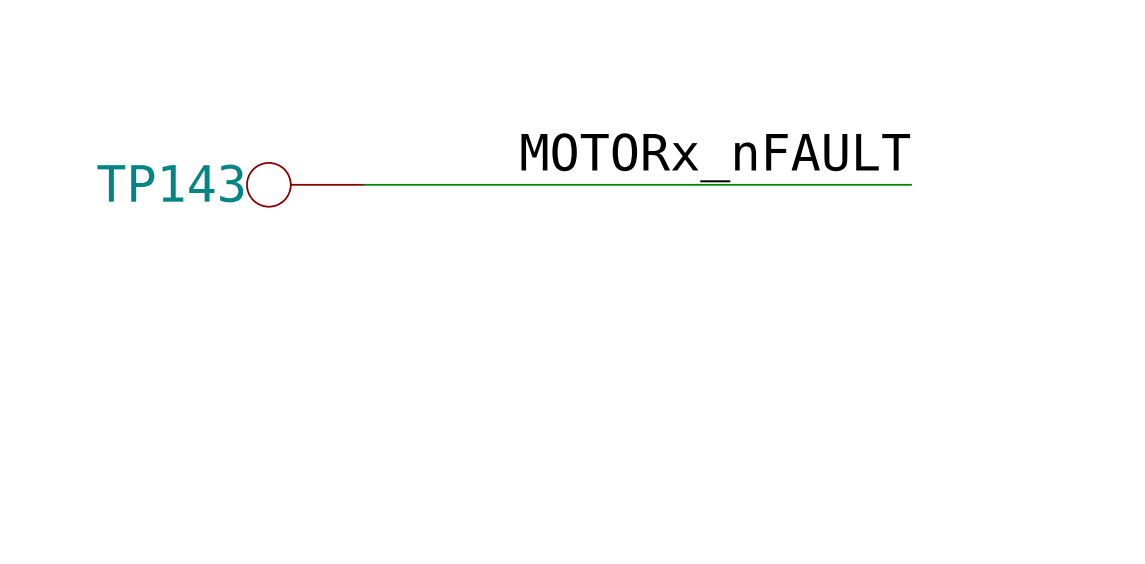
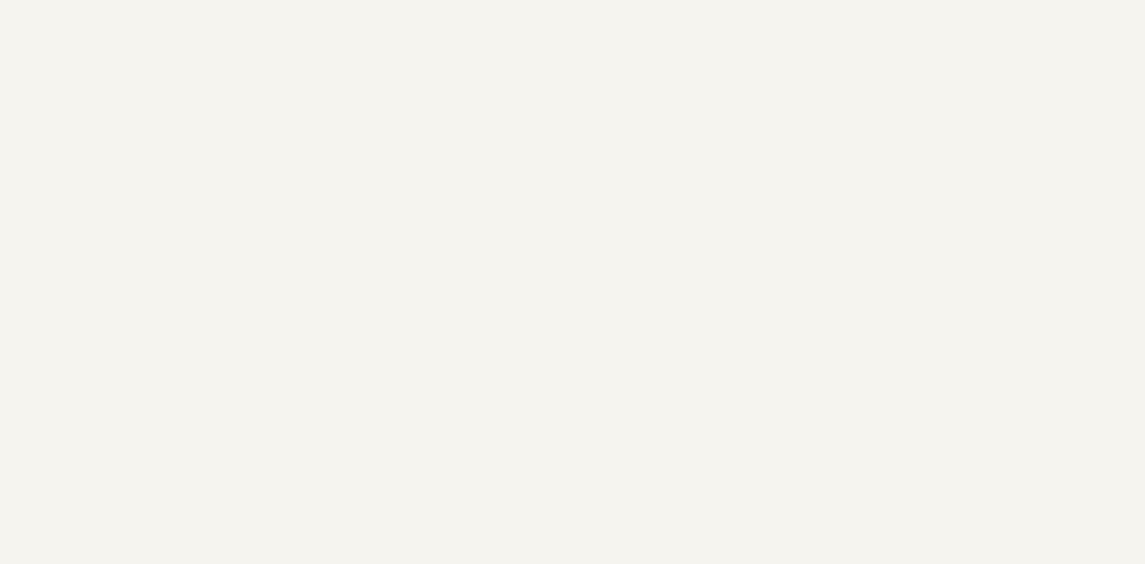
label: MOTORx_nFAULT (715, 157) -> none
TP143: (305, 184) -> none
wire: (363, 184) (911, 184) -> none

